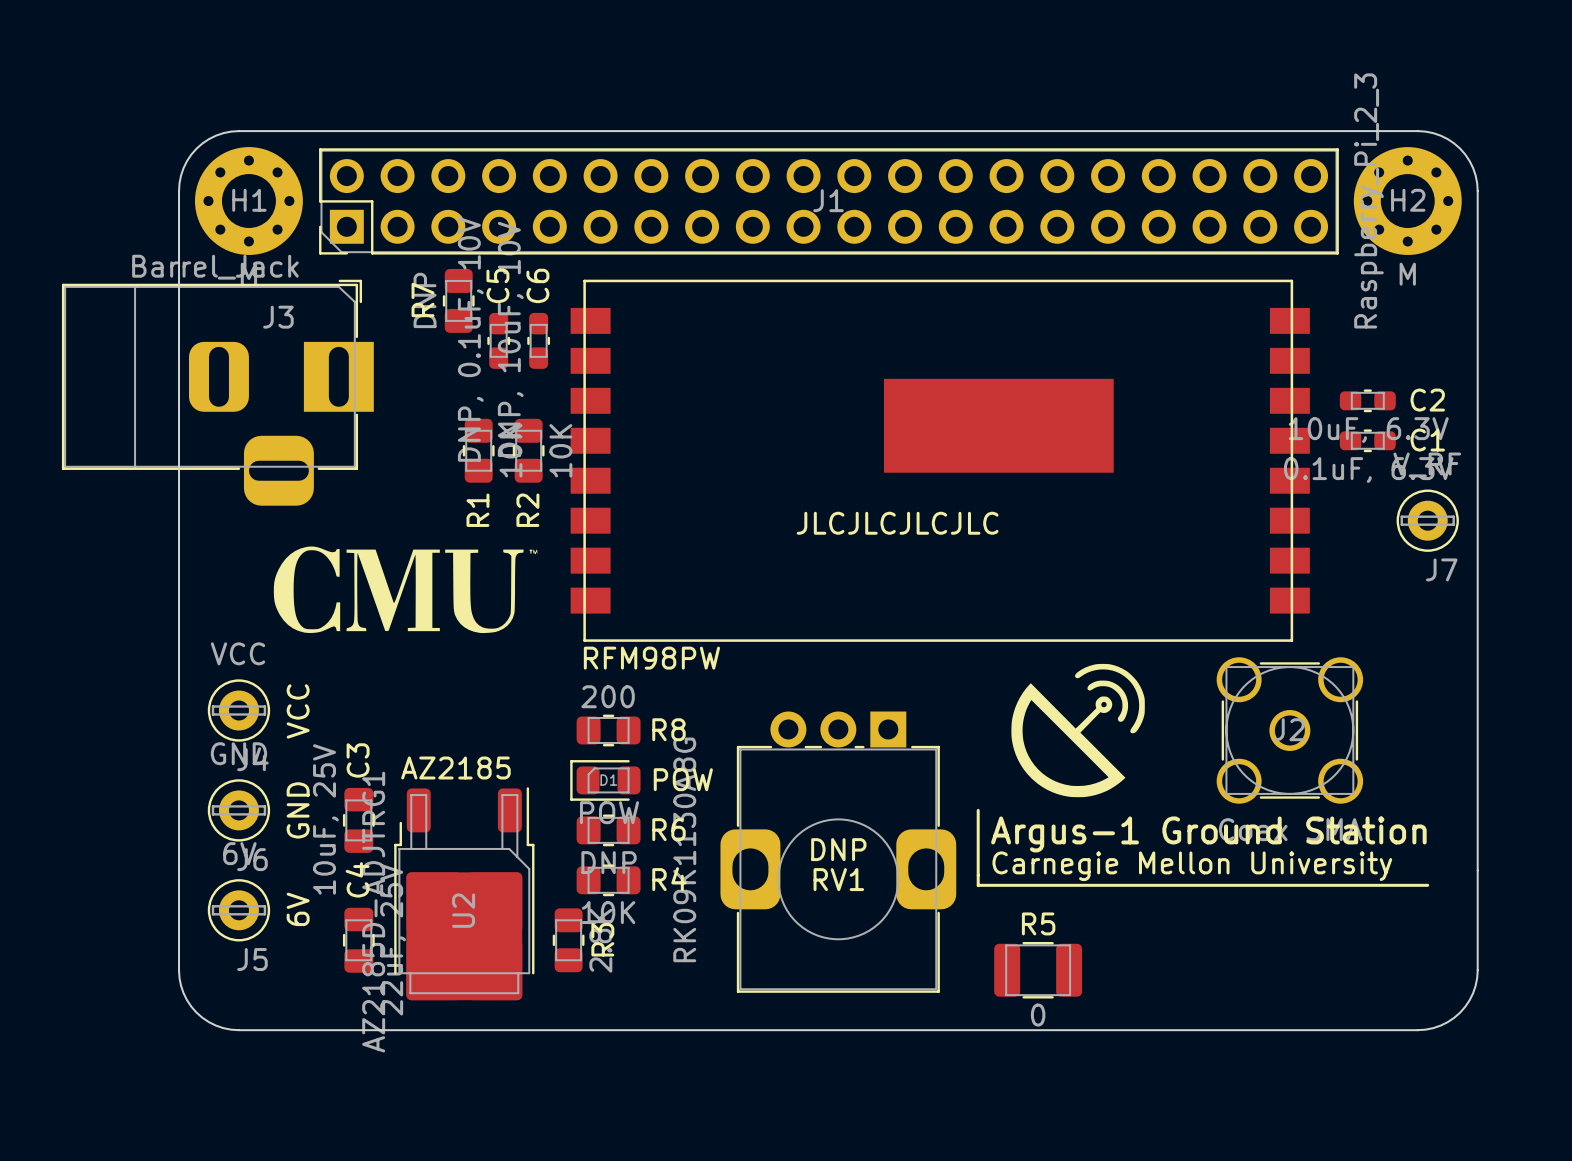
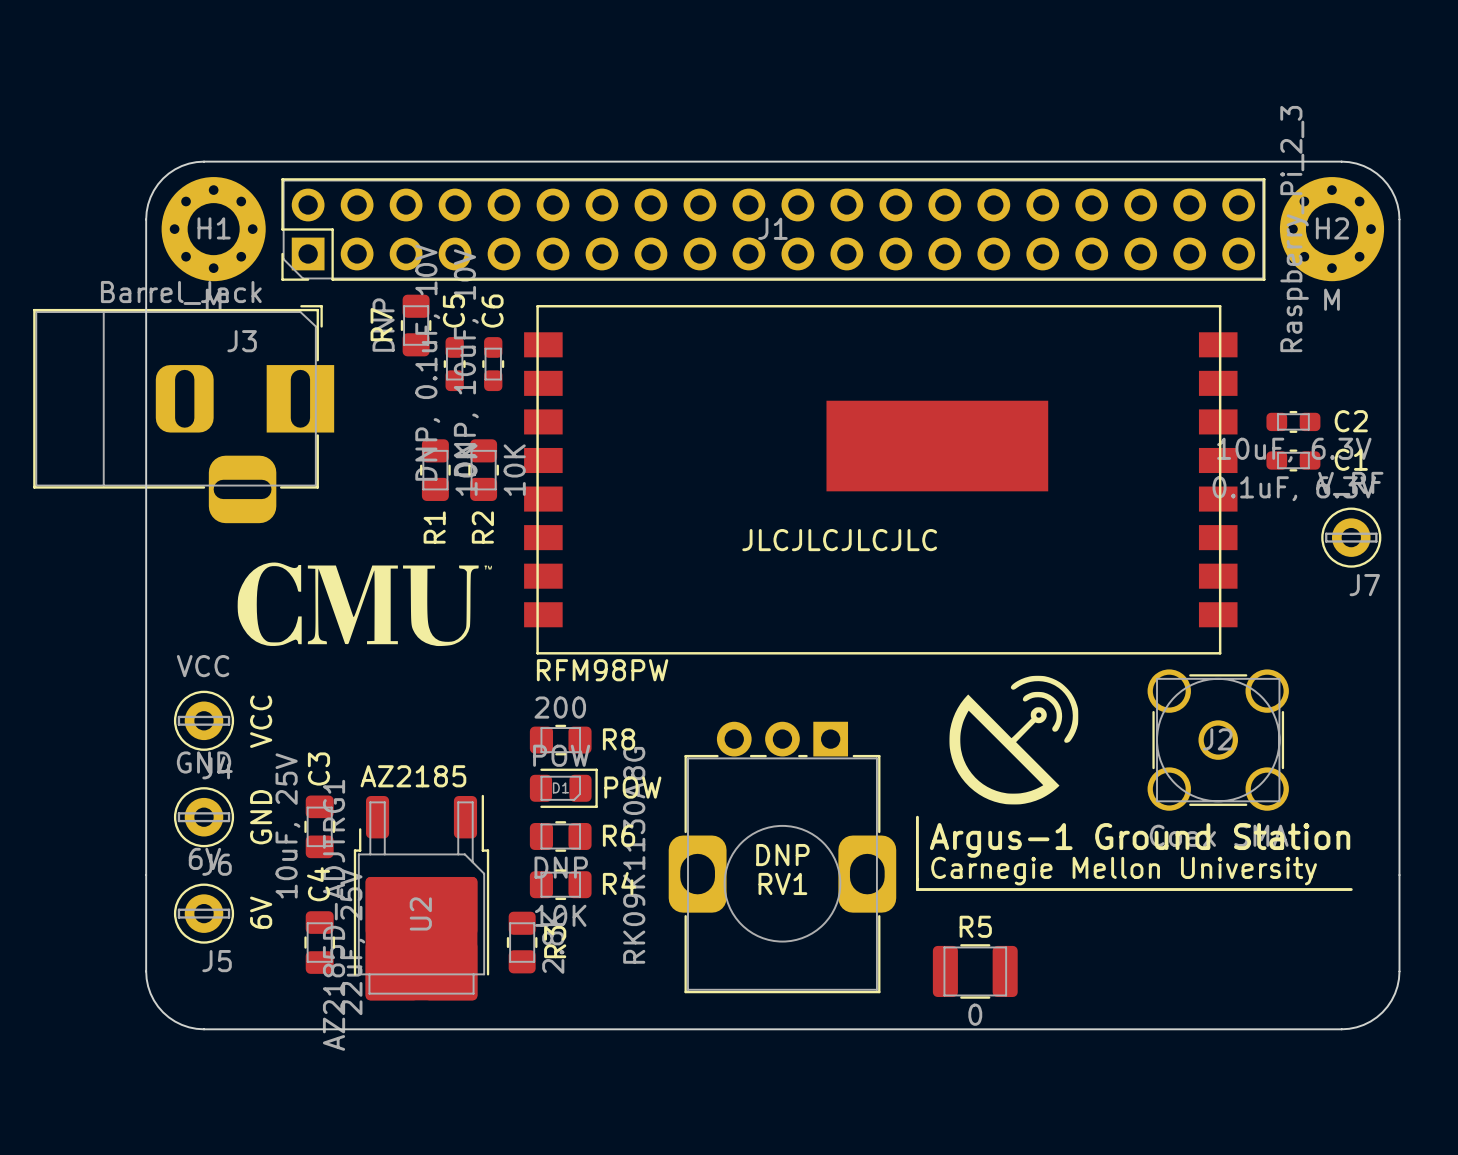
D1 rotation: 0° (605, 780) -> 180° (563, 788)

